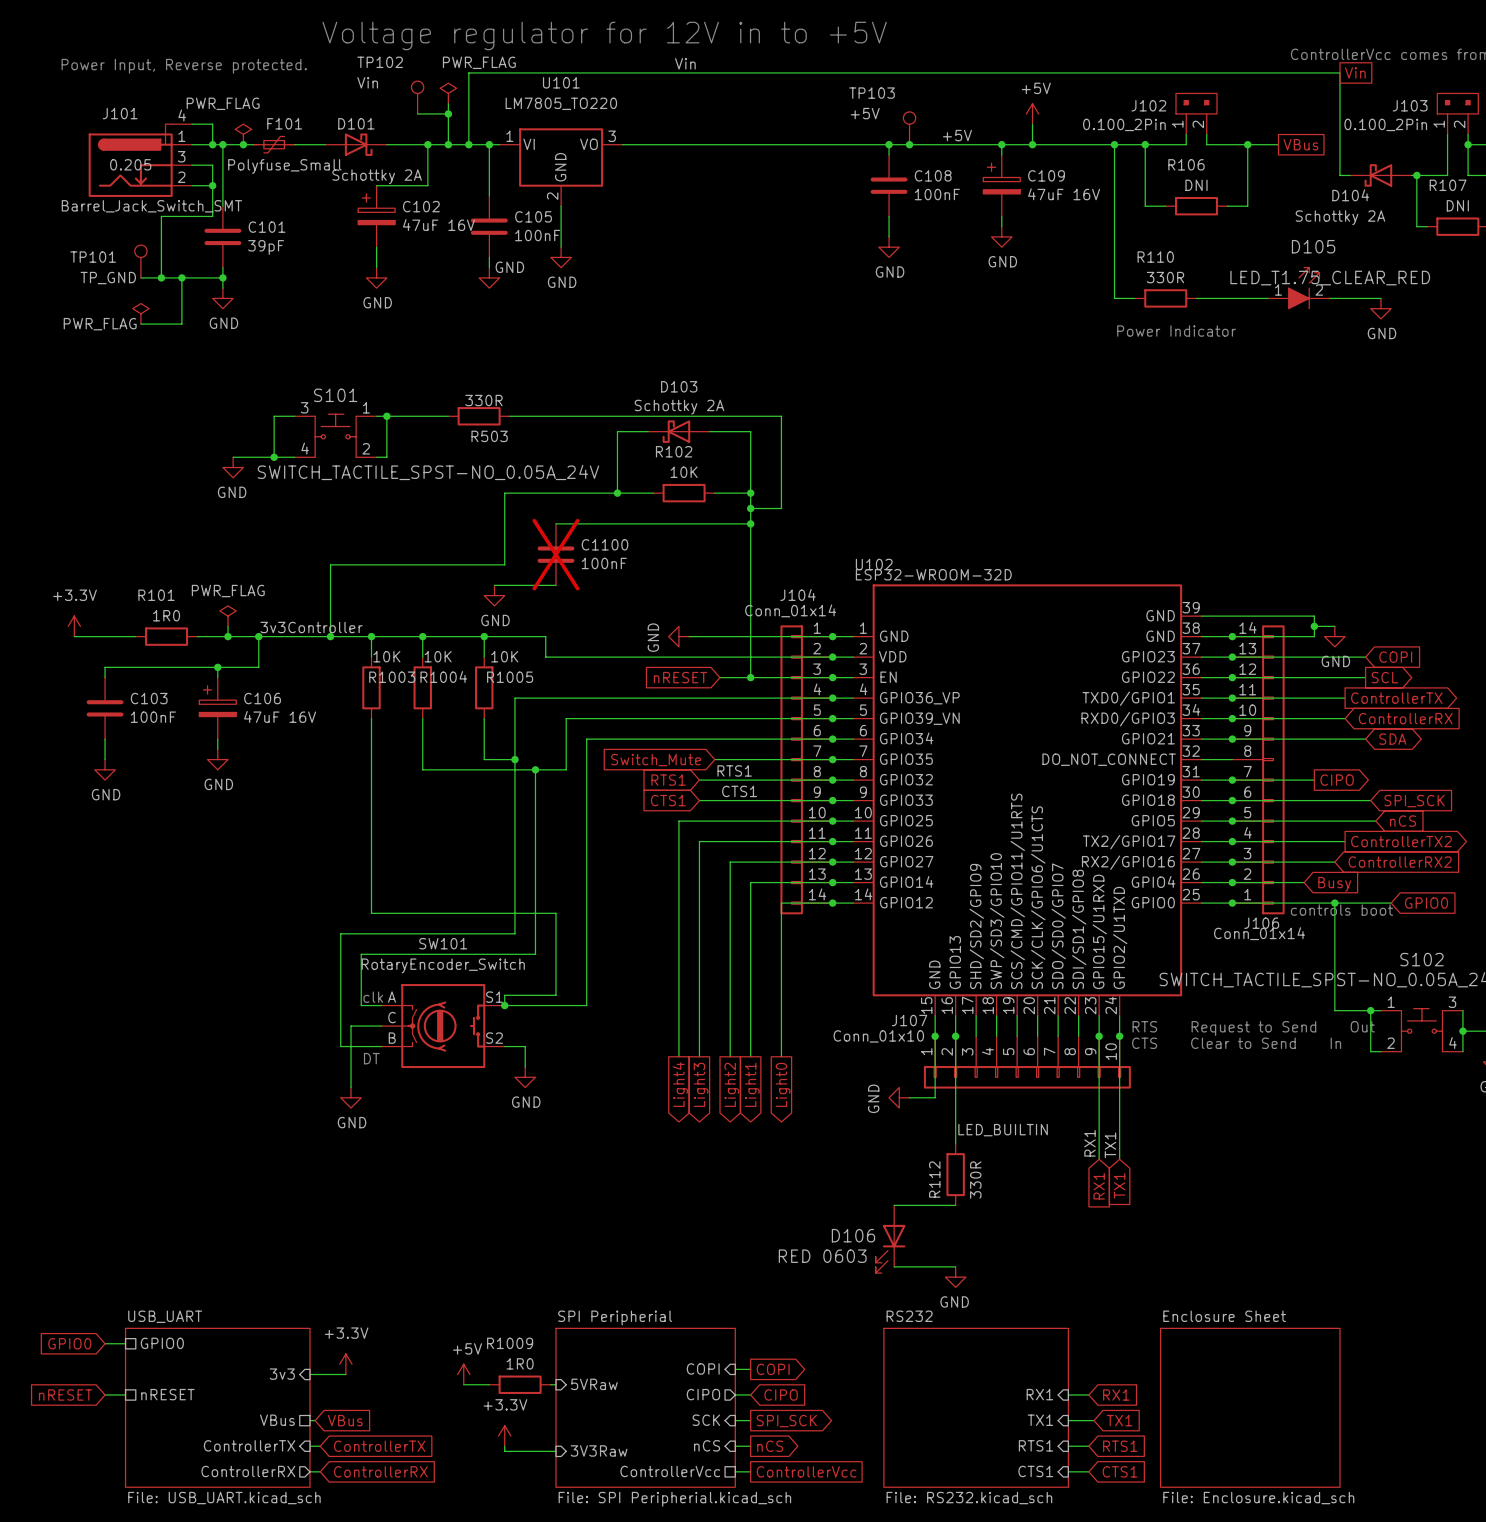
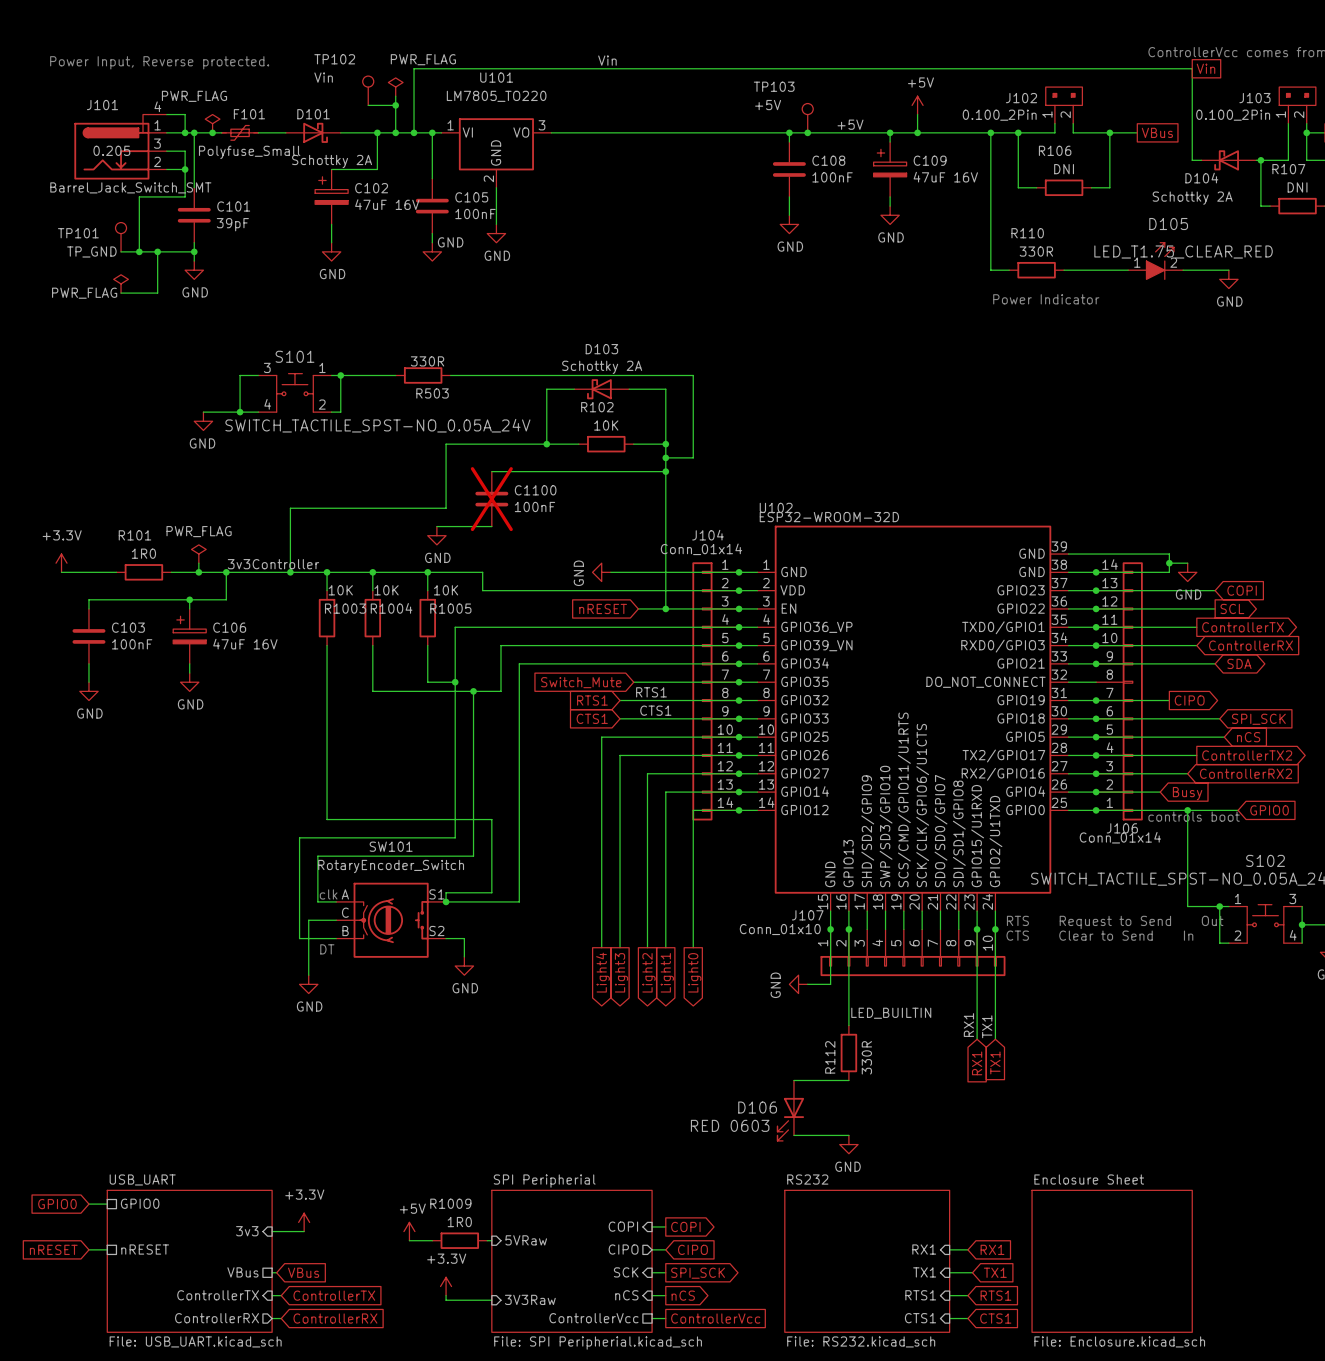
text: Voltage regulator for 12V in to +5V (604, 35) -> none

